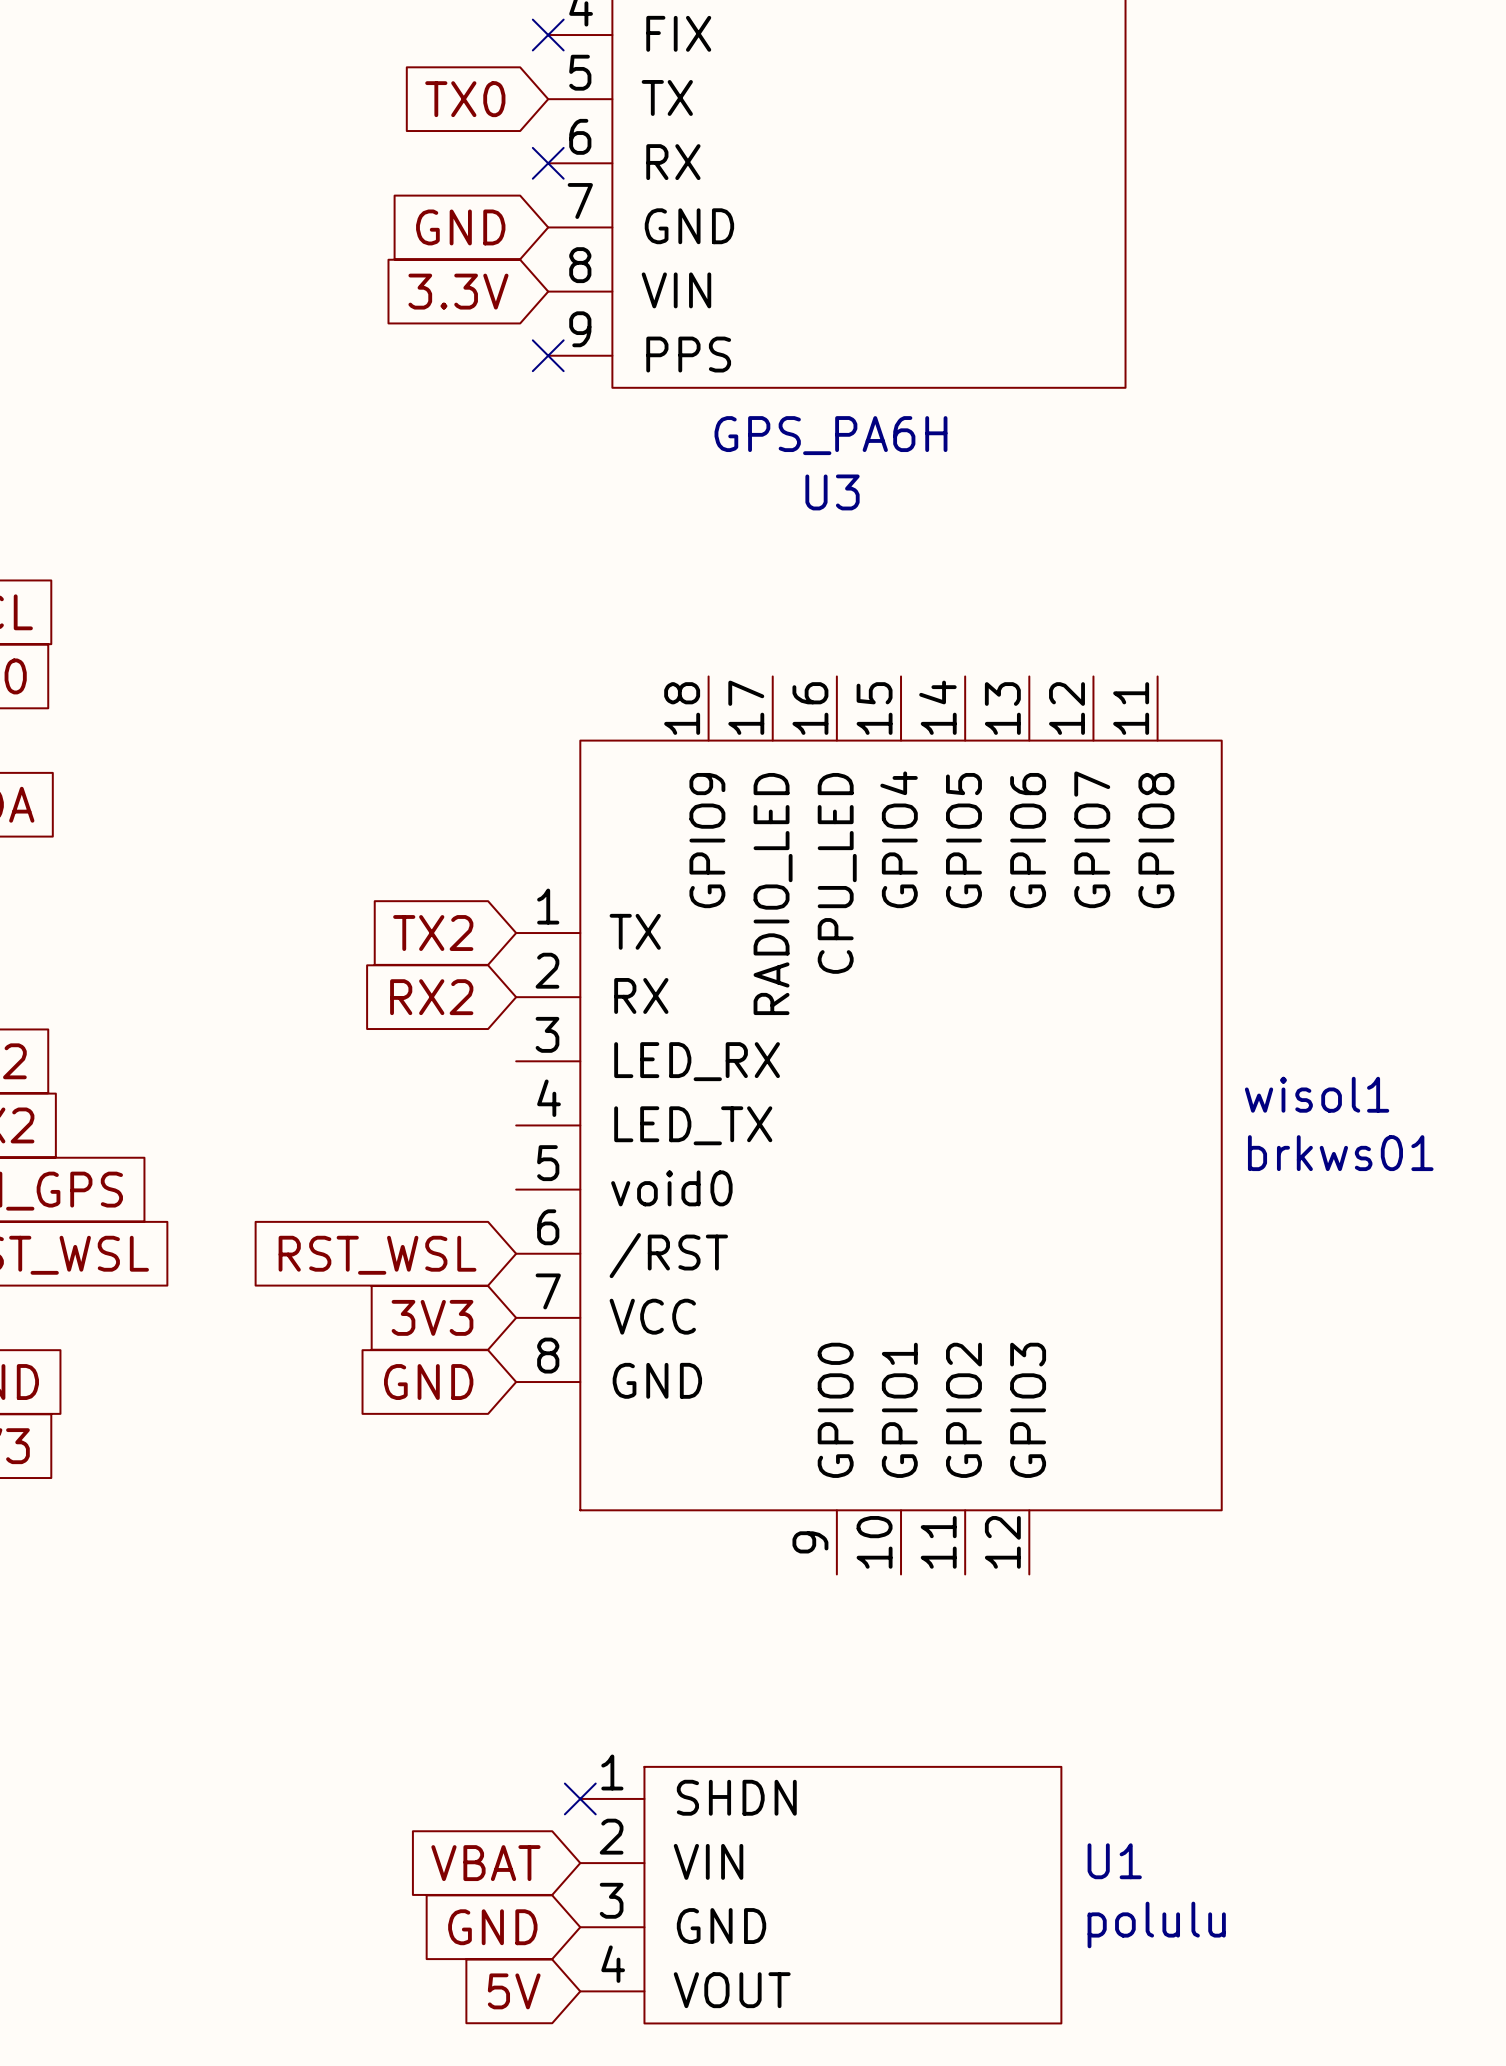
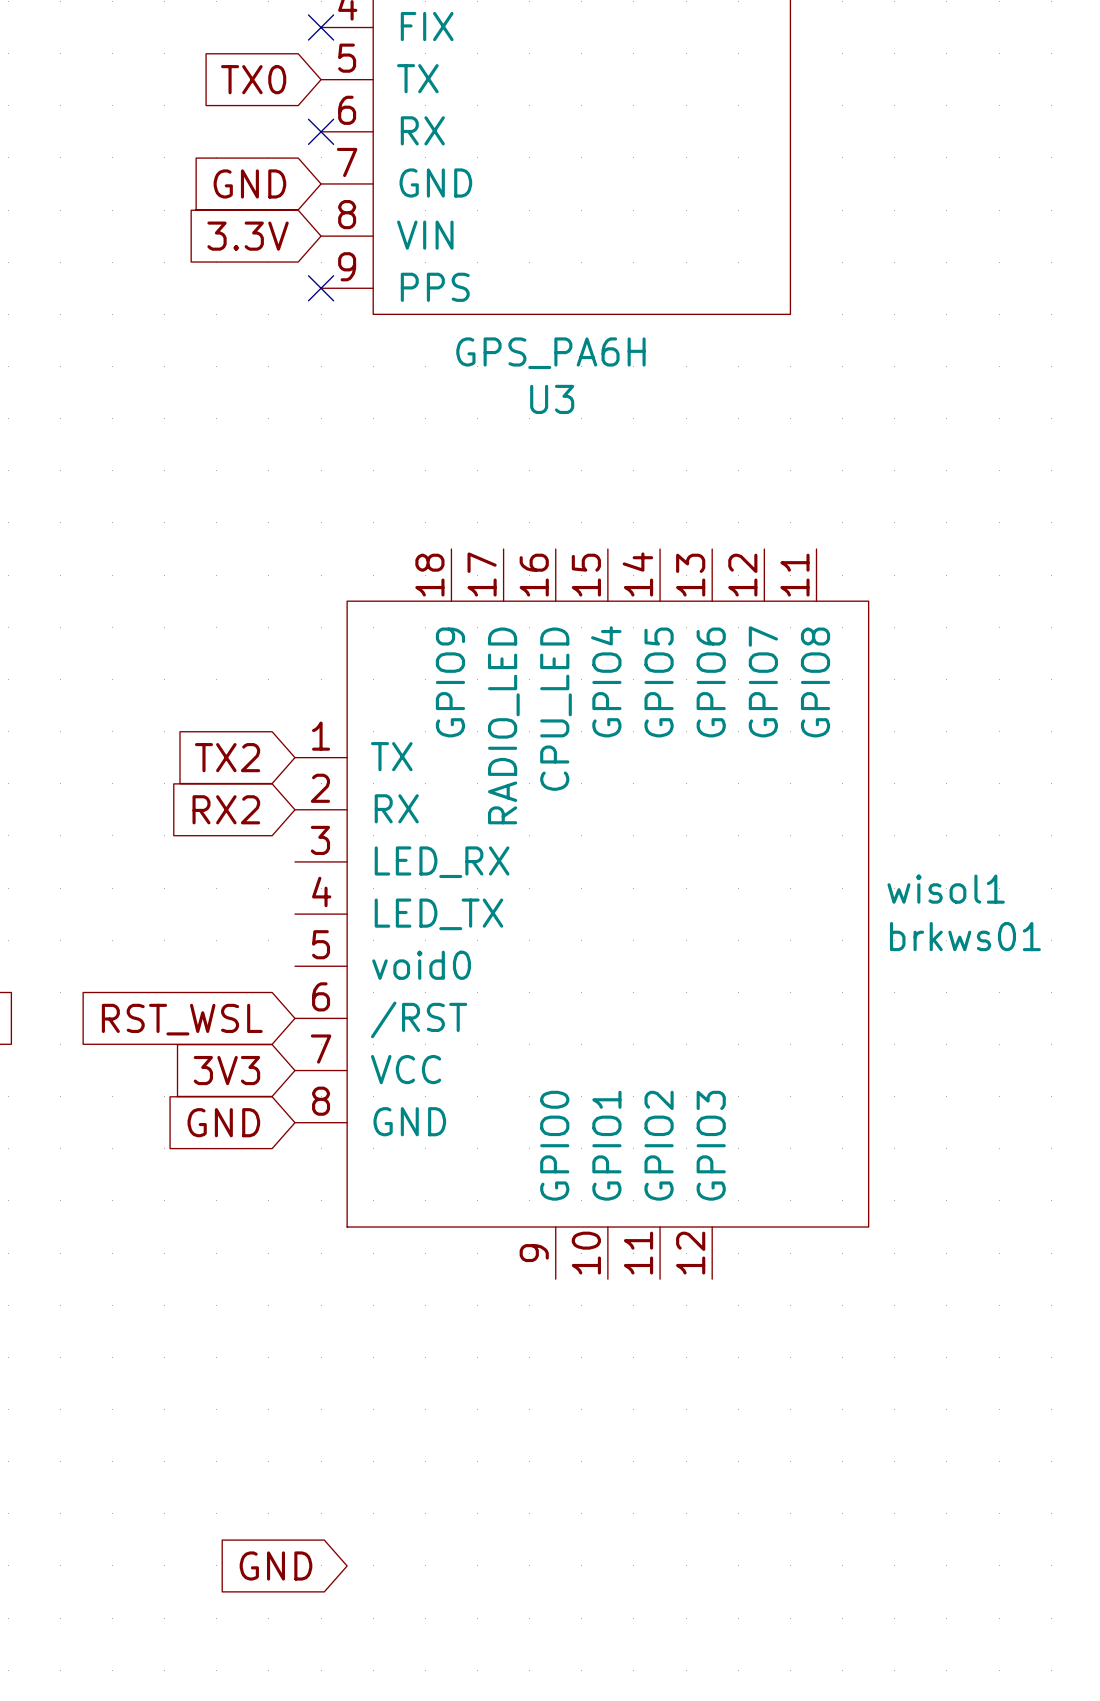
no-connect mark: (580, 1798) -> none
global label: VBAT (485, 1863) -> none
U1: polulu (820, 1895) -> none
global label: 5V (514, 1991) -> none

